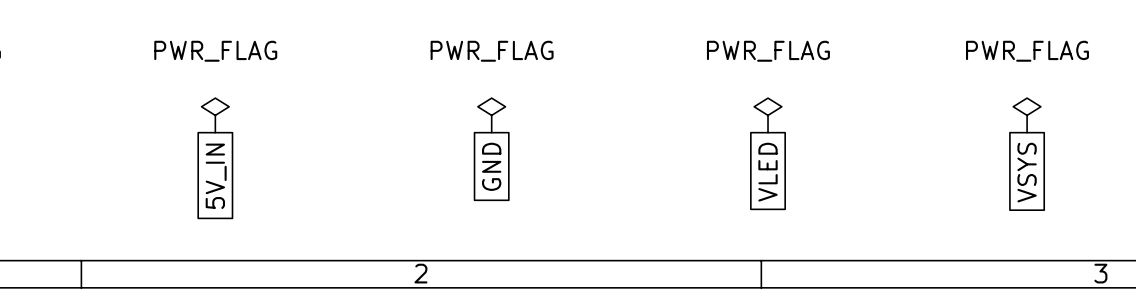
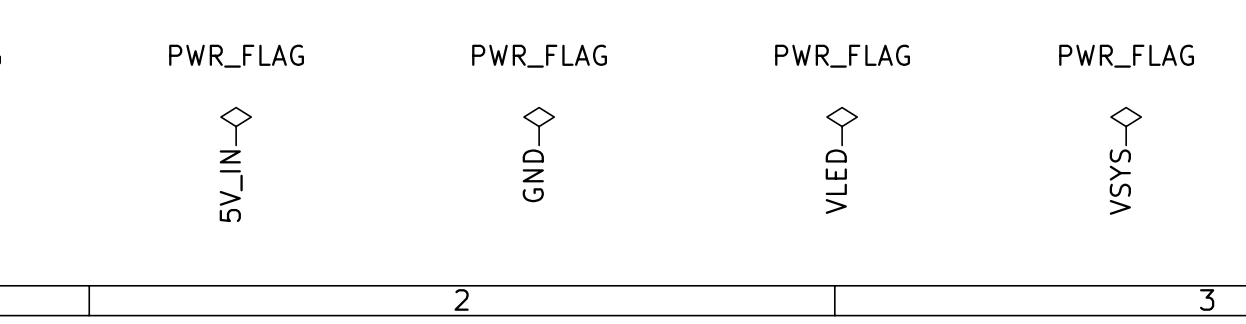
label: none -> GND (533, 175)
label: none -> VLED (836, 181)
global label: GND (491, 166) -> none
label: none -> VSYS (1120, 182)
label: none -> 5V_IN (231, 186)
global label: VLED (768, 172) -> none
global label: VSYS (1027, 172) -> none
global label: 5V_IN (216, 176) -> none

